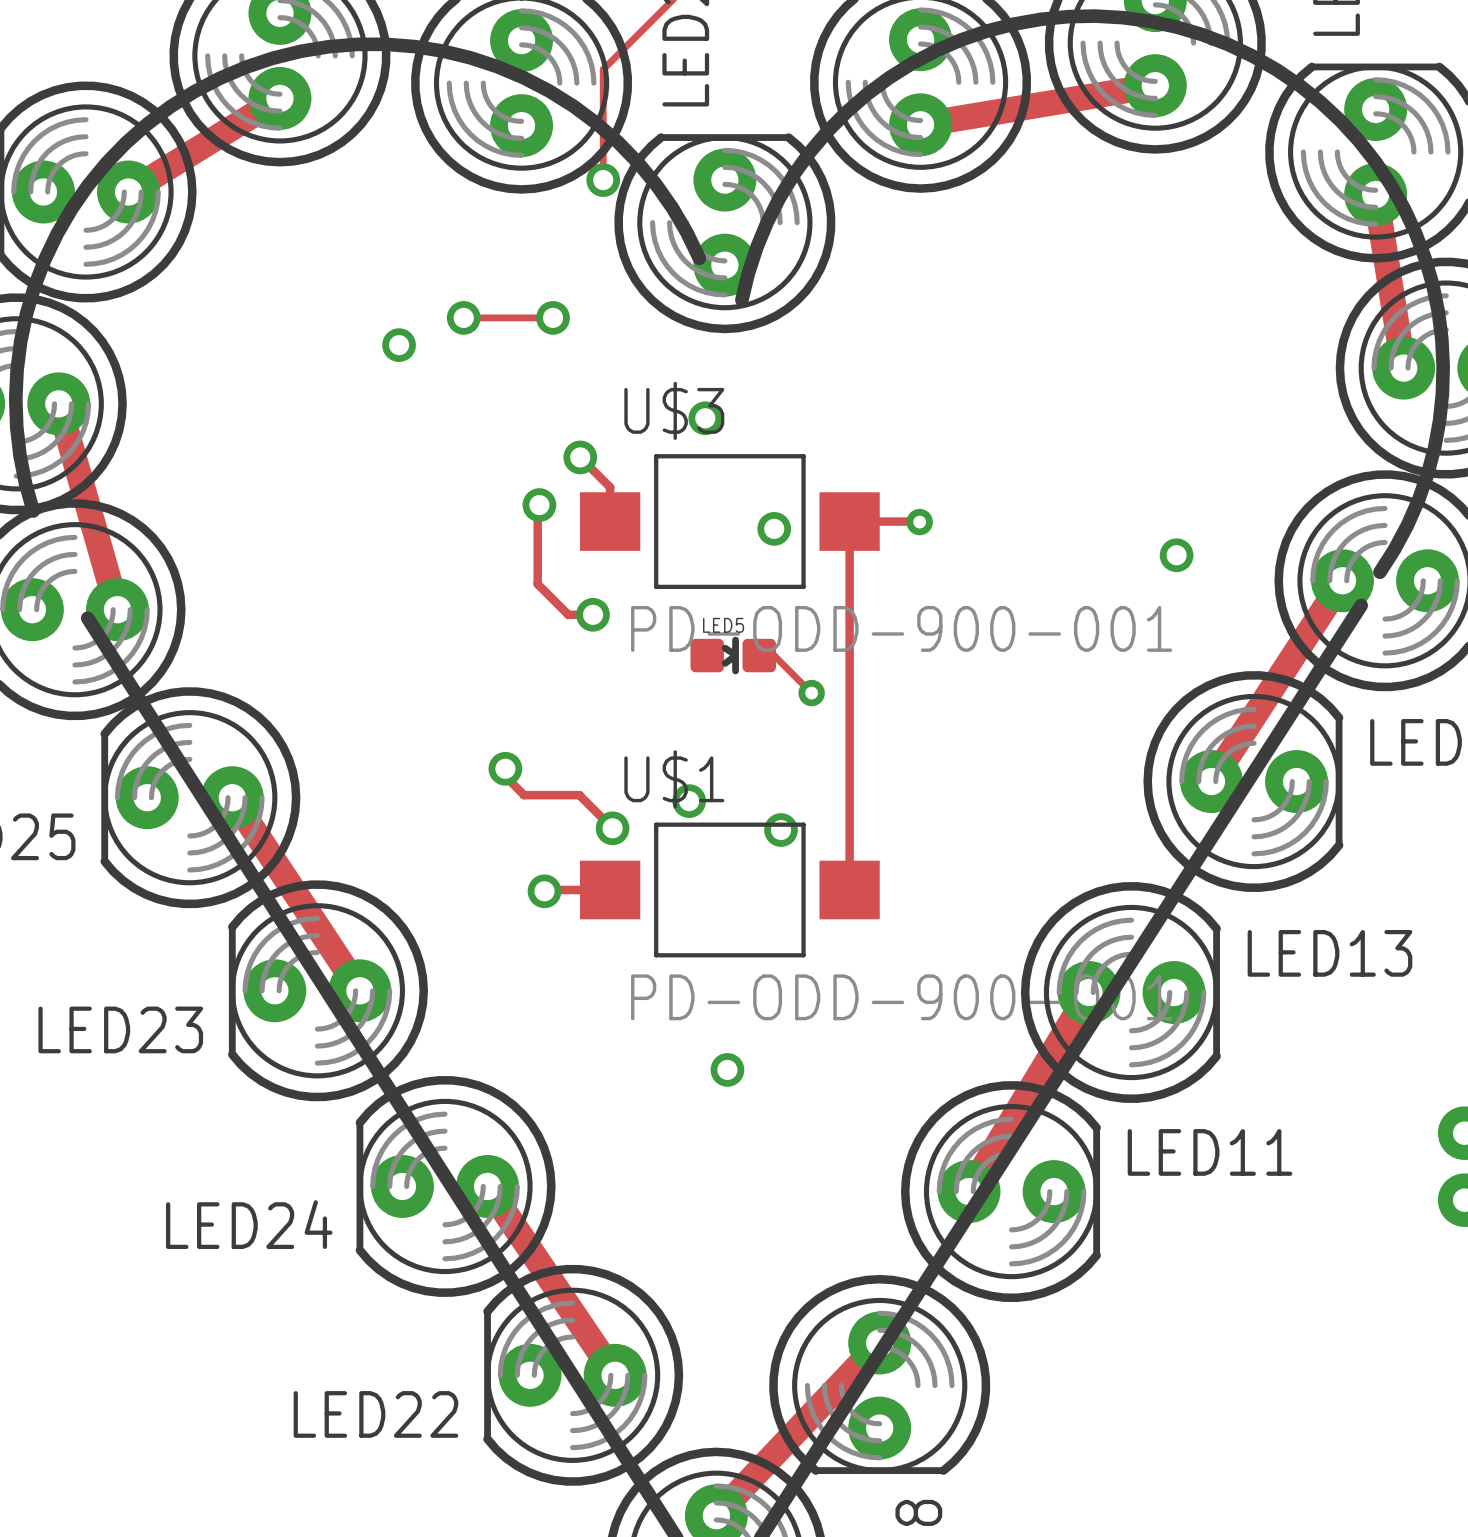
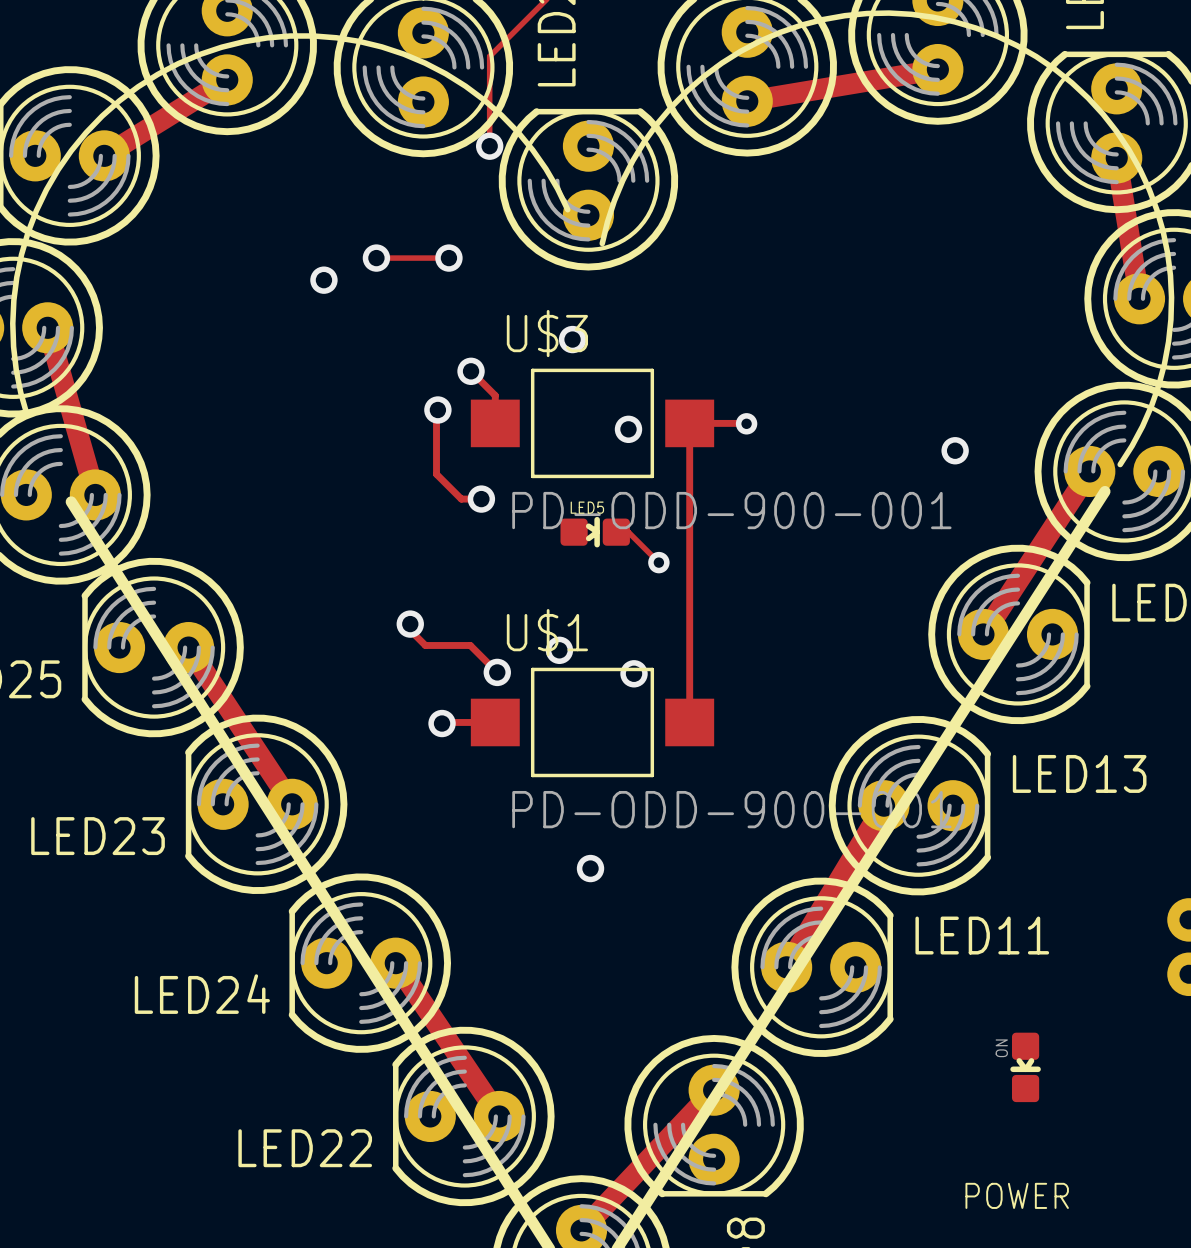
line width: thick (699, 258) (672, 207) (637, 162) (596, 123) (549, 91) (523, 77) (497, 66) (442, 51) (385, 44) (328, 46) (272, 58) (245, 67) (219, 78) (170, 106) (125, 143) (87, 185) (57, 233) (44, 259) (26, 313) (17, 369) (15, 398) (19, 455) (33, 511) -> thin (567, 209) (545, 168) (517, 131) (484, 100) (445, 73) (425, 63) (403, 54) (359, 41) (313, 35) (267, 37) (221, 47) (199, 54) (178, 63) (138, 86) (102, 116) (71, 150) (46, 189) (36, 210) (21, 254) (13, 300) (12, 323) (16, 369) (26, 414)
line width: thick (741, 300) (748, 273) (767, 222) (779, 197) (809, 152) (827, 131) (867, 94) (889, 77) (936, 50) (987, 30) (1013, 24) (1040, 19) (1095, 16) (1122, 17) (1176, 26) (1228, 44) (1252, 56) (1299, 85) (1320, 102) (1358, 140) (1390, 185) (1404, 208) (1415, 233) (1432, 285) (1441, 339) (1443, 366) (1439, 421) (1427, 474) (1418, 500) (1394, 549) (1379, 572) -> thin (602, 243) (607, 222) (622, 180) (632, 160) (657, 123) (671, 106) (703, 76) (721, 63) (760, 41) (801, 25) (823, 19) (844, 15) (889, 13) (911, 14) (954, 21) (996, 36) (1016, 45) (1054, 69) (1071, 82) (1103, 114) (1129, 150) (1139, 169) (1149, 189) (1163, 231) (1170, 275) (1171, 297) (1168, 341) (1158, 385) (1151, 406) (1132, 445) (1120, 464)
POWER: none -> ON (1025, 1067)

